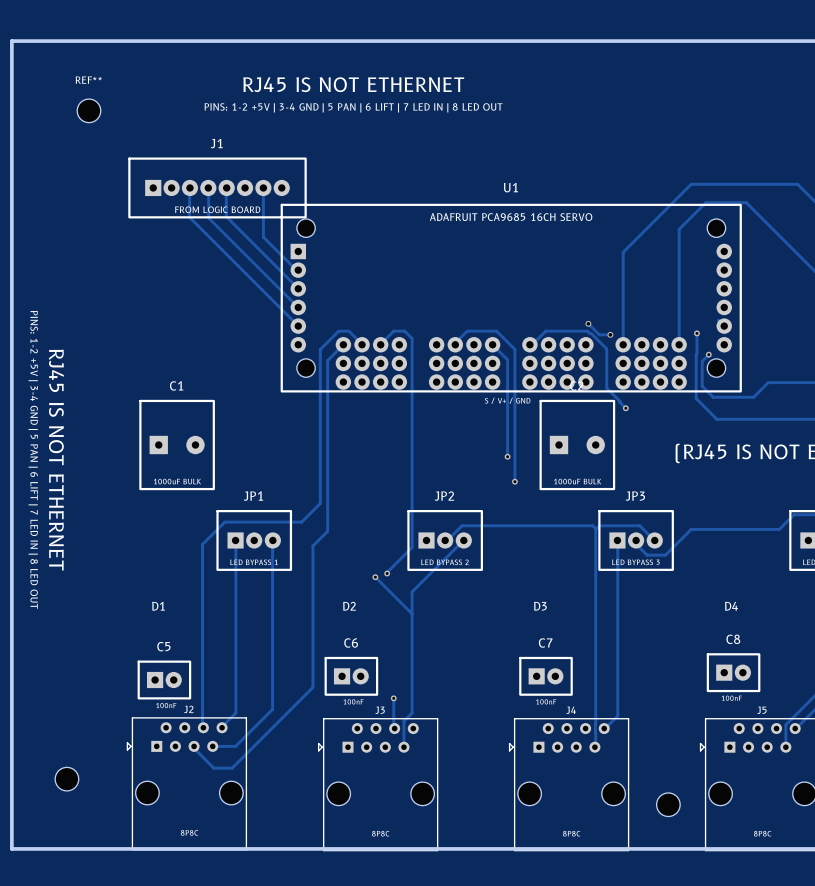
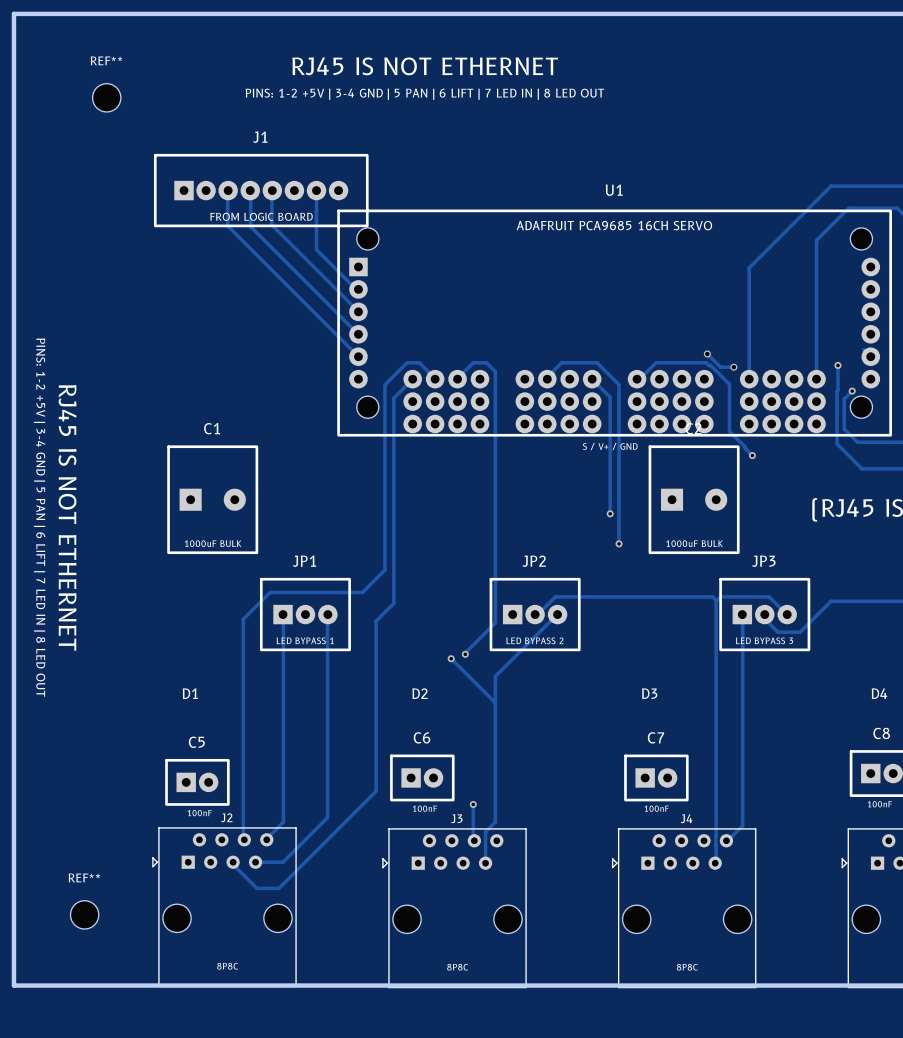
part: (66, 779) -> none
REF**: none -> (84, 914)
part: (668, 804) -> none

